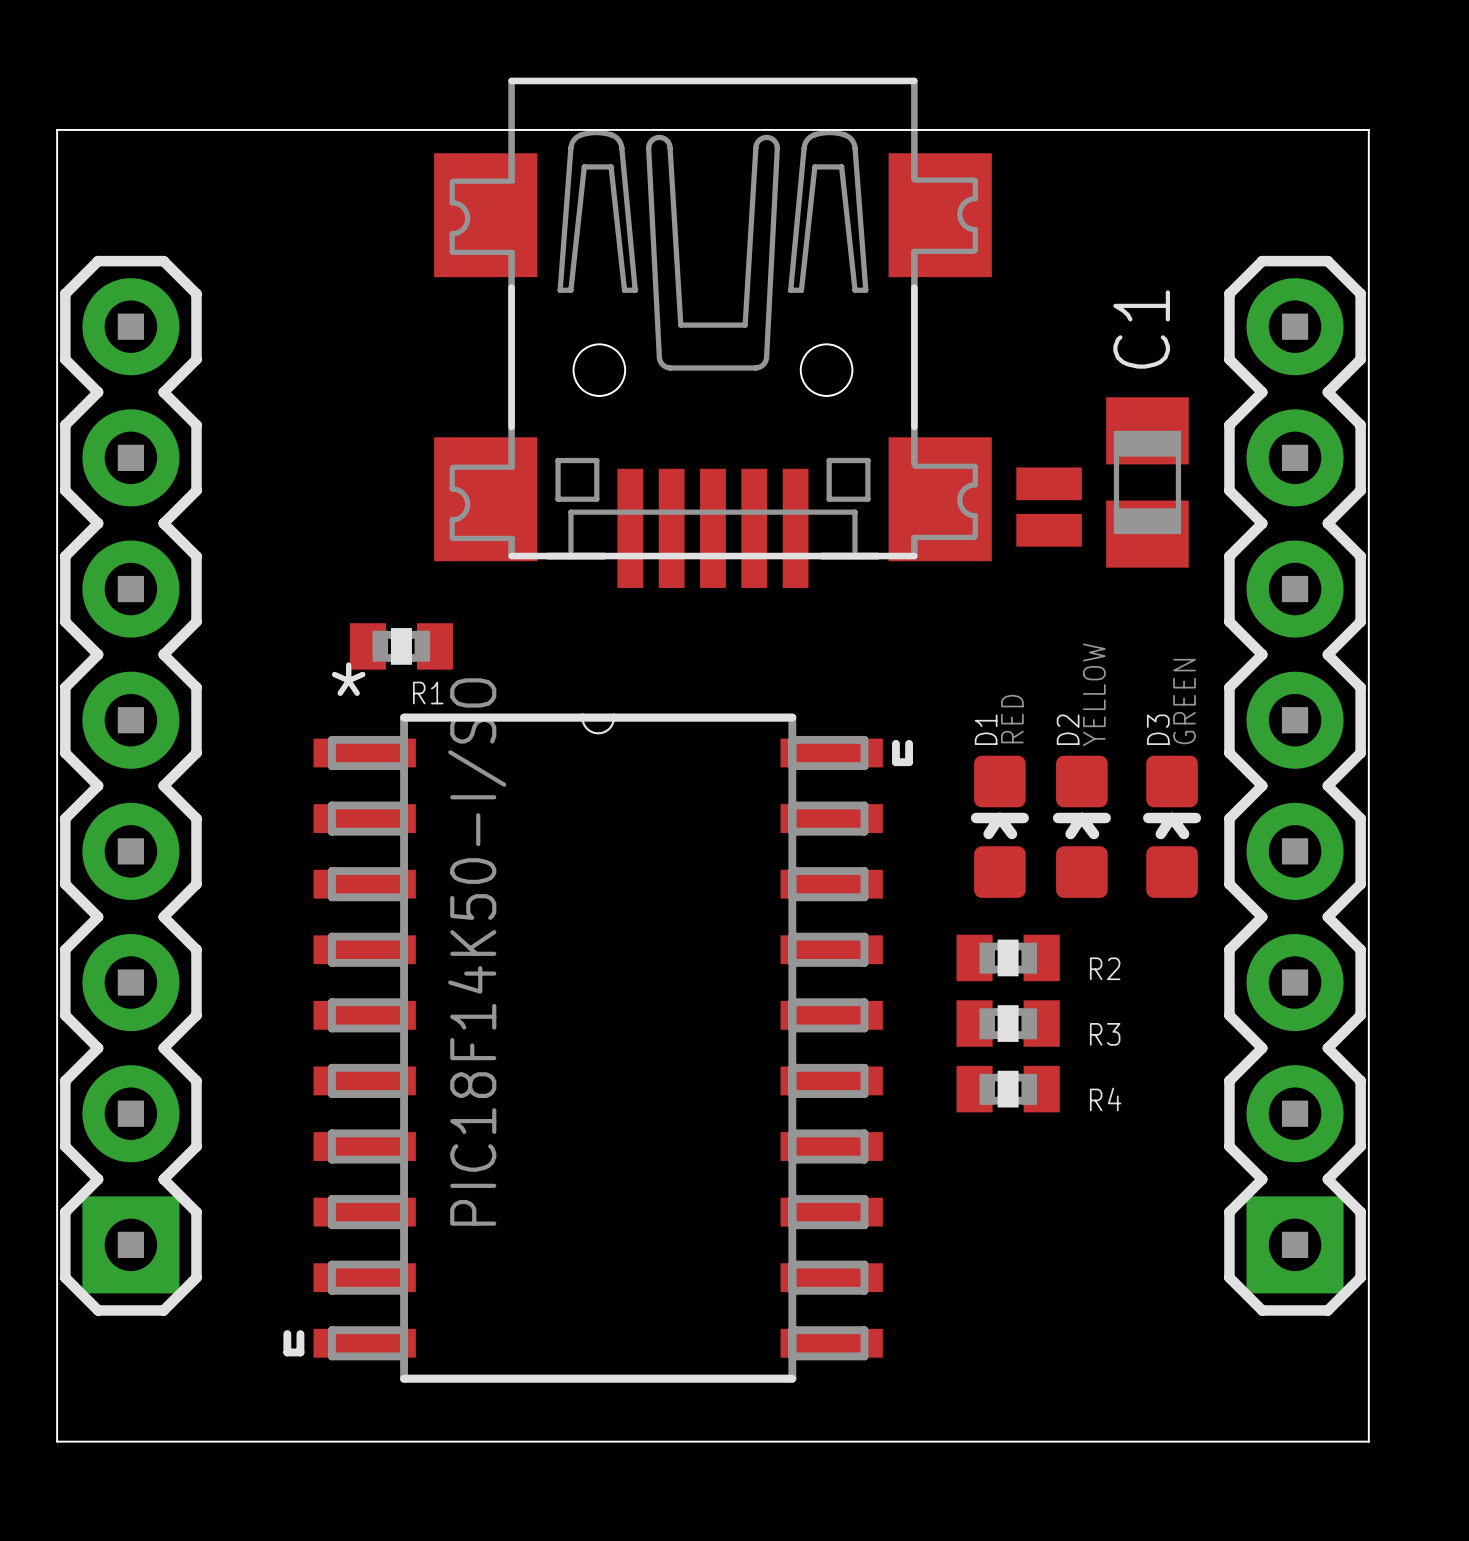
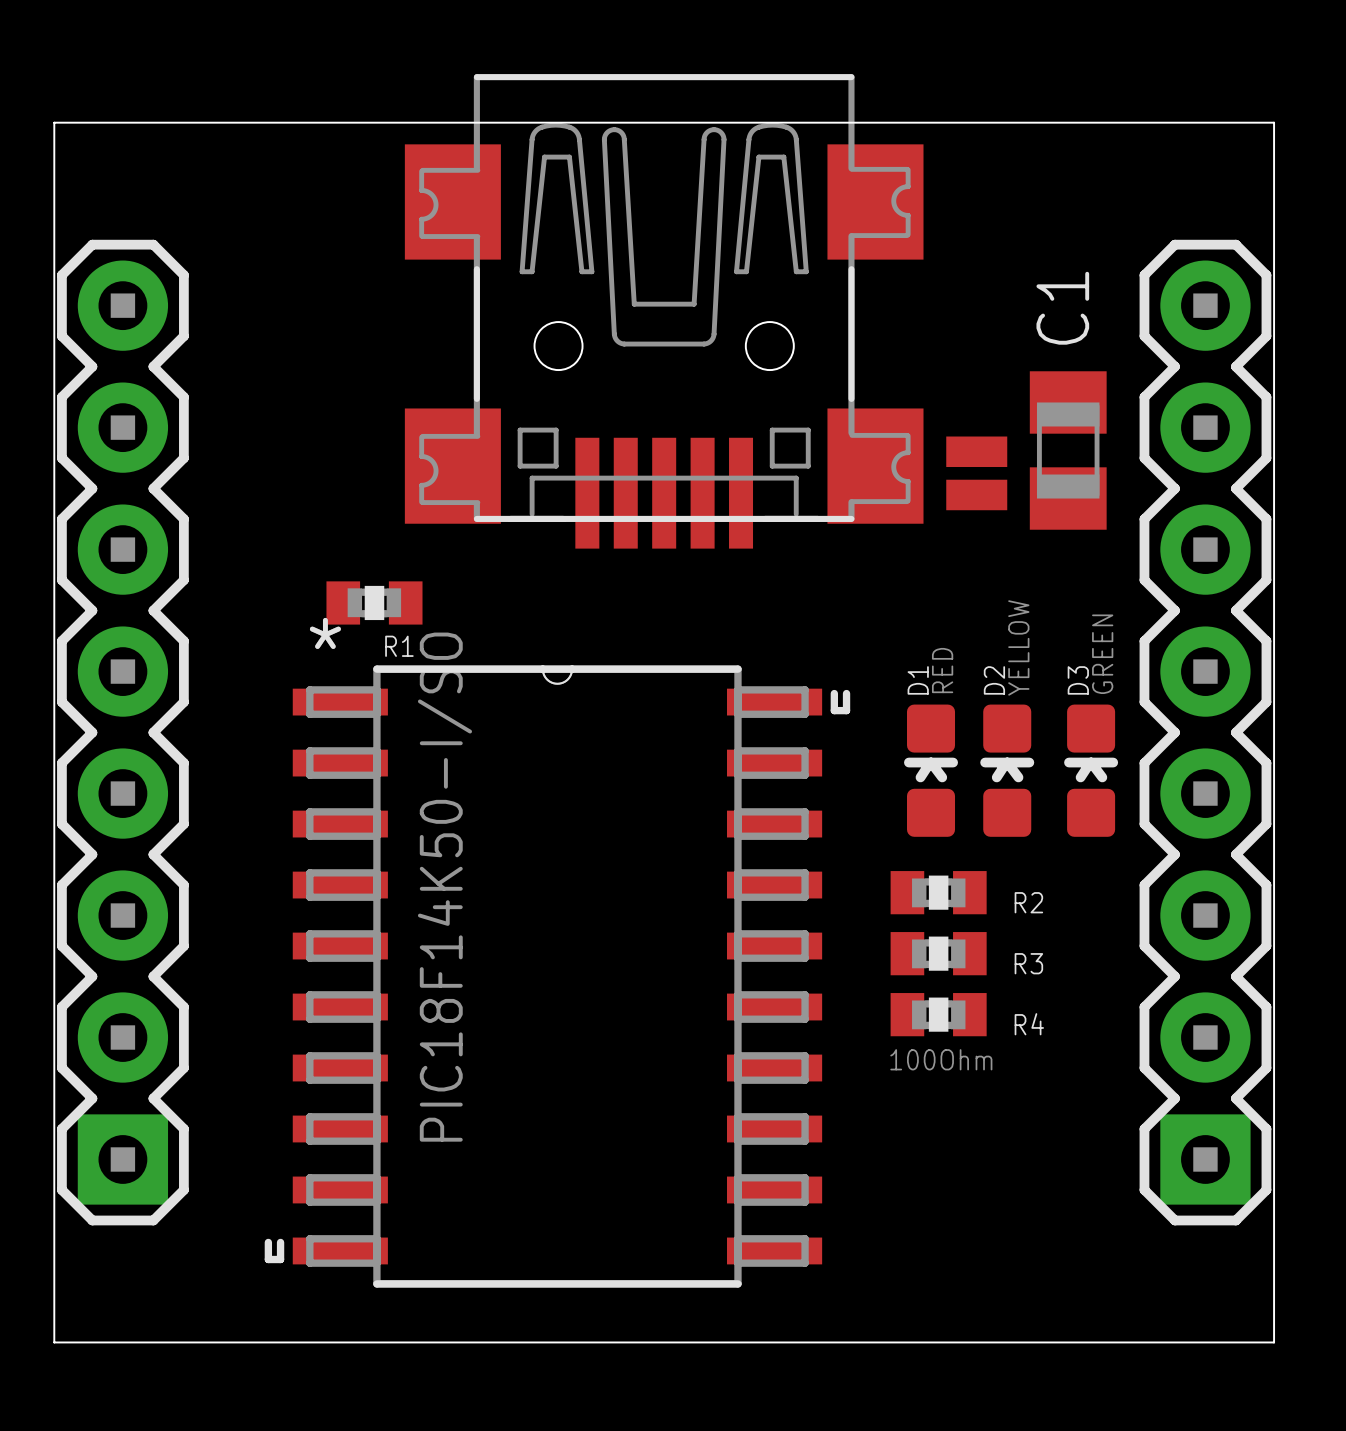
R4 value: none -> 100Ohm (941, 1059)

